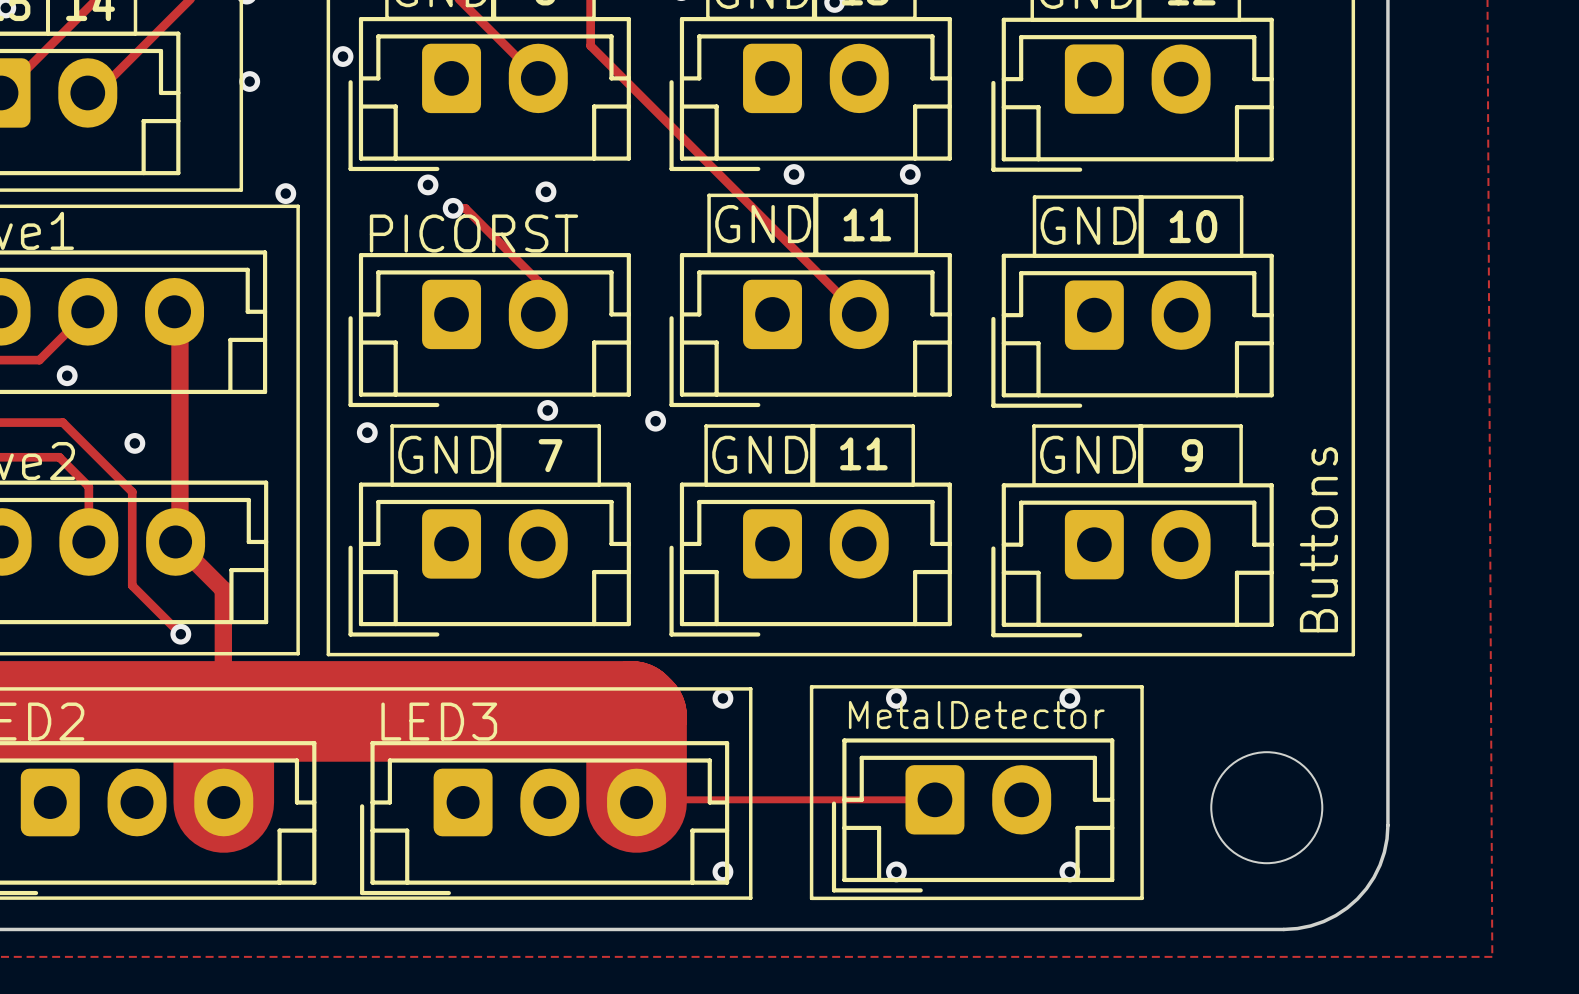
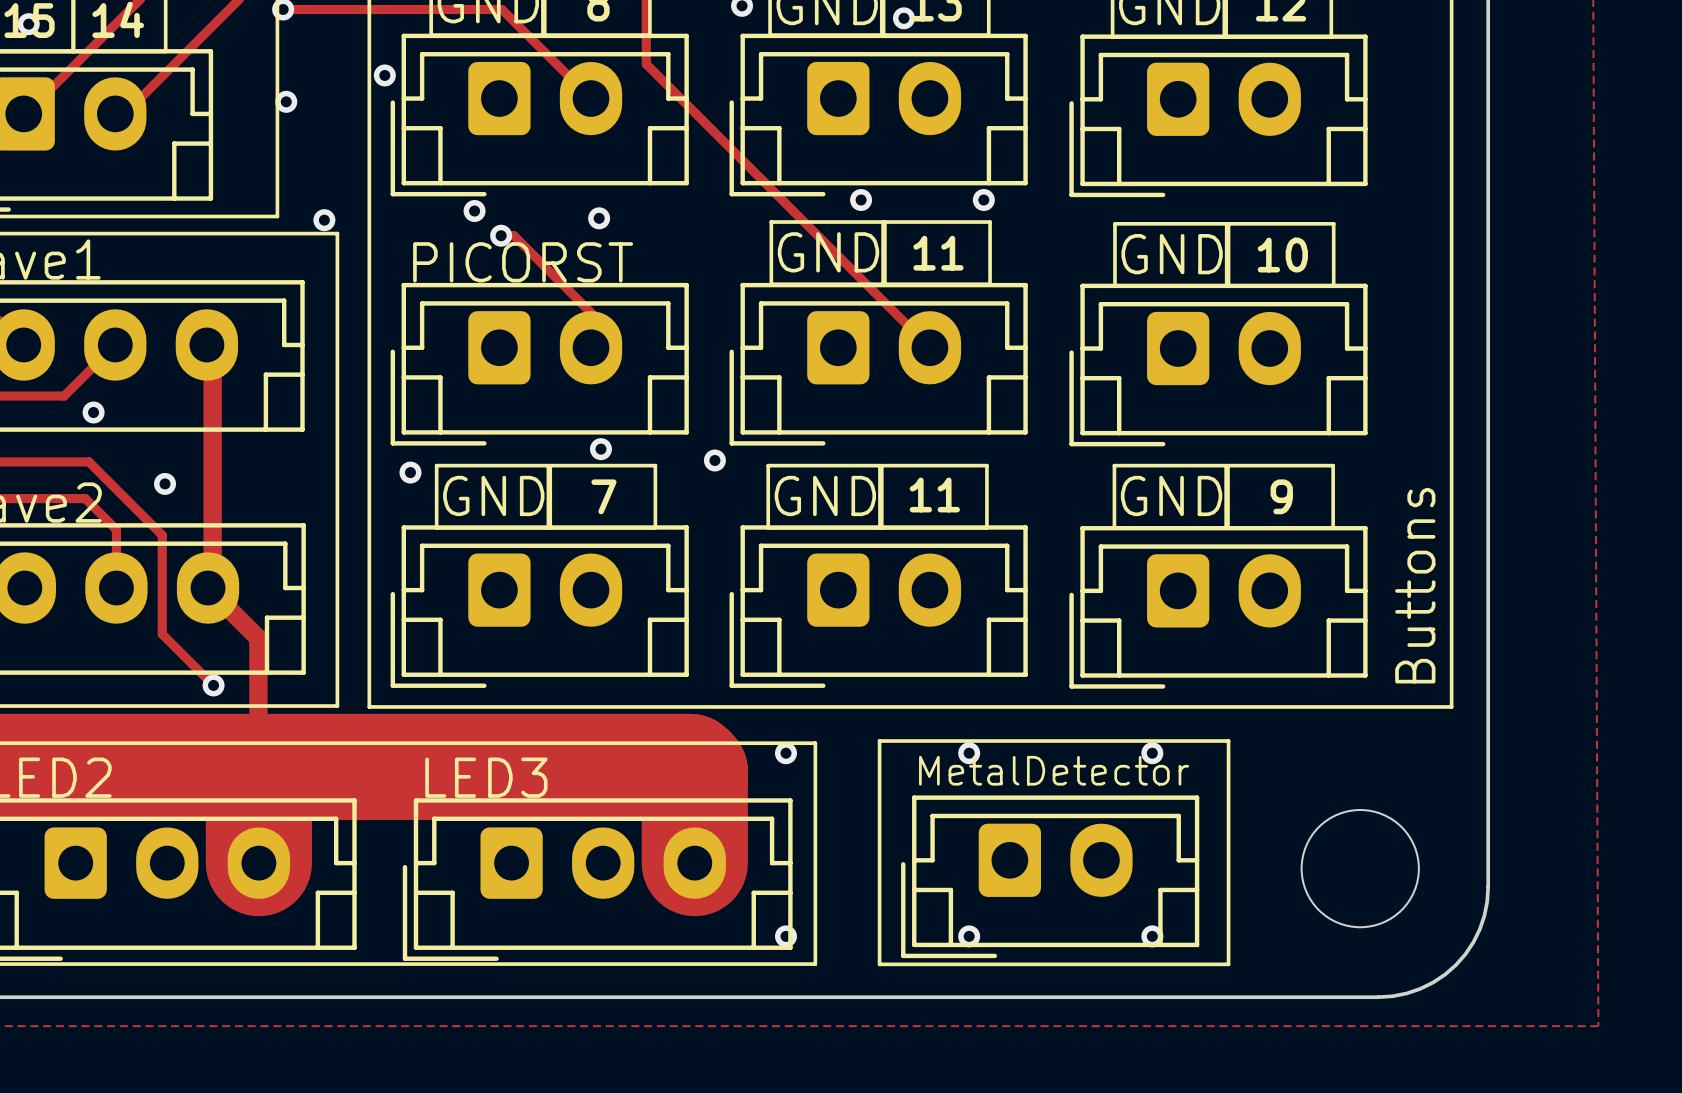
track: (934, 799) (639, 799) (636, 802) -> none

